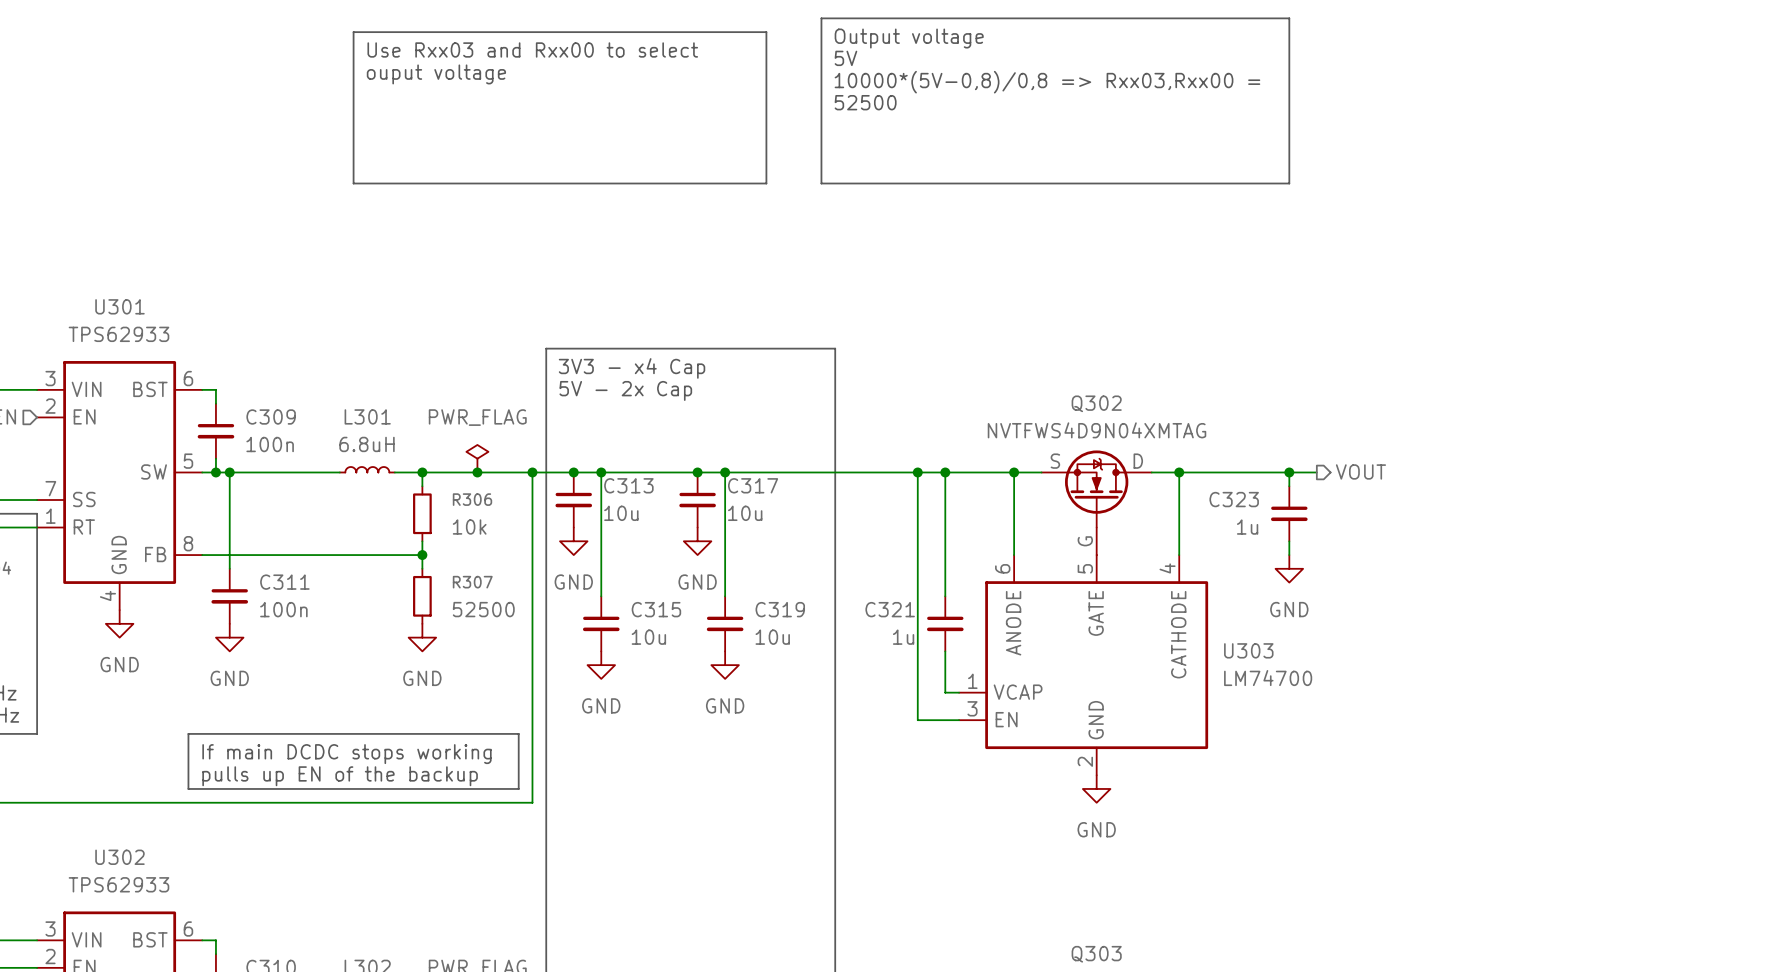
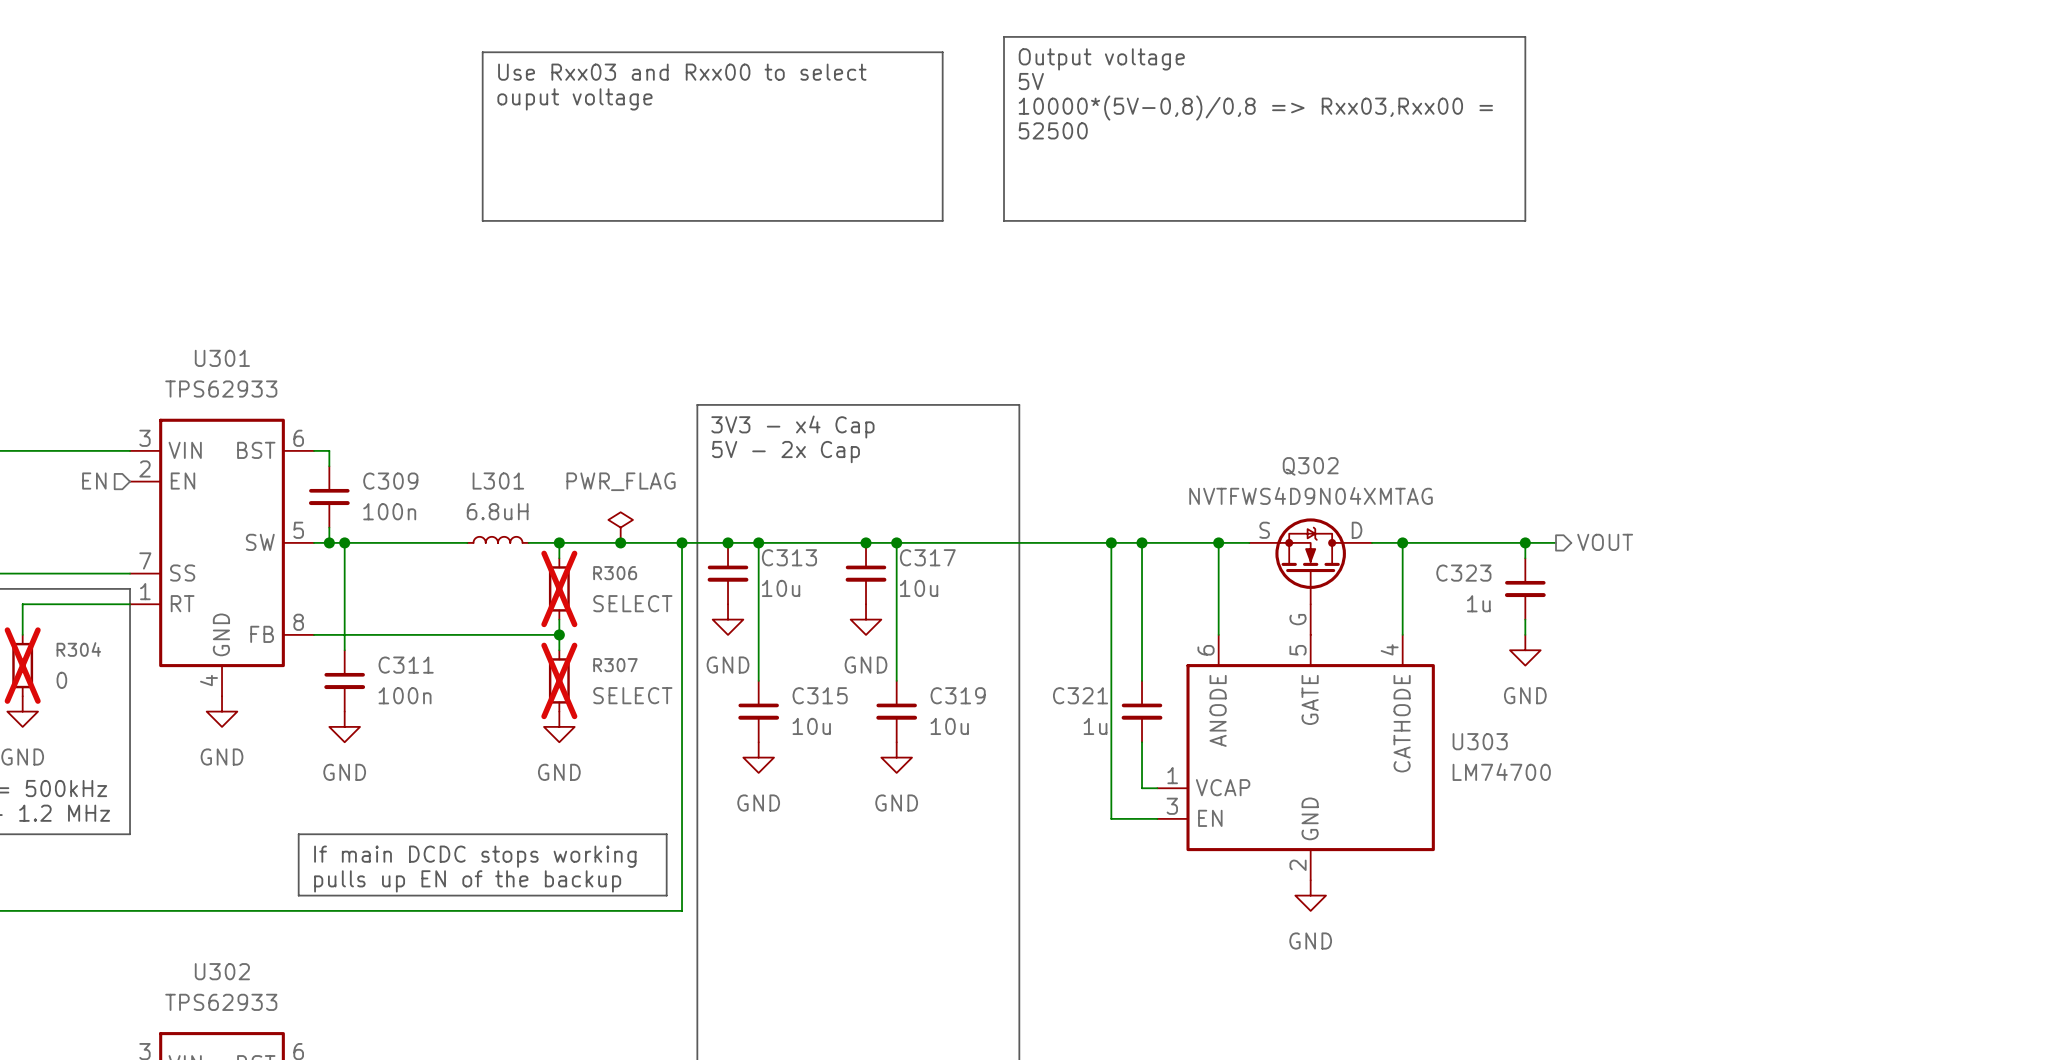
R306 do-not-place cross: none -> (559, 588)
R306 value: 10k (469, 527) -> SELECT (632, 603)
R307 do-not-place cross: none -> (559, 680)
R307 value: 52500 (483, 609) -> SELECT (632, 695)

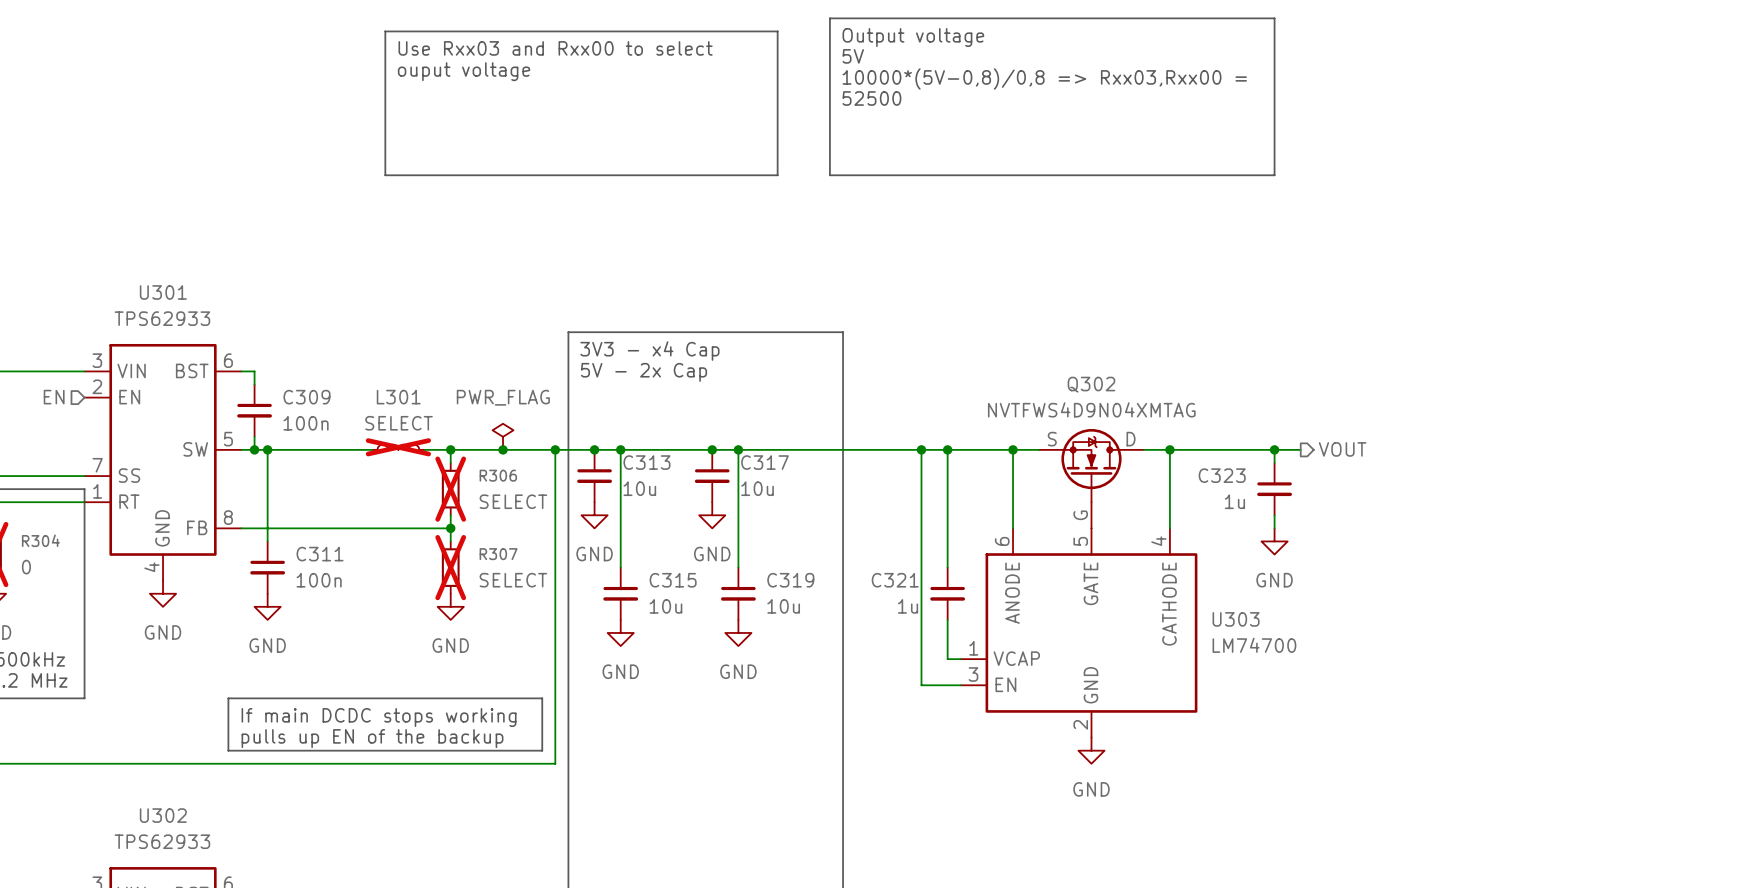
L301 value: 6.8uH (497, 511) -> SELECT (399, 423)
L301 do-not-place cross: none -> (398, 447)

